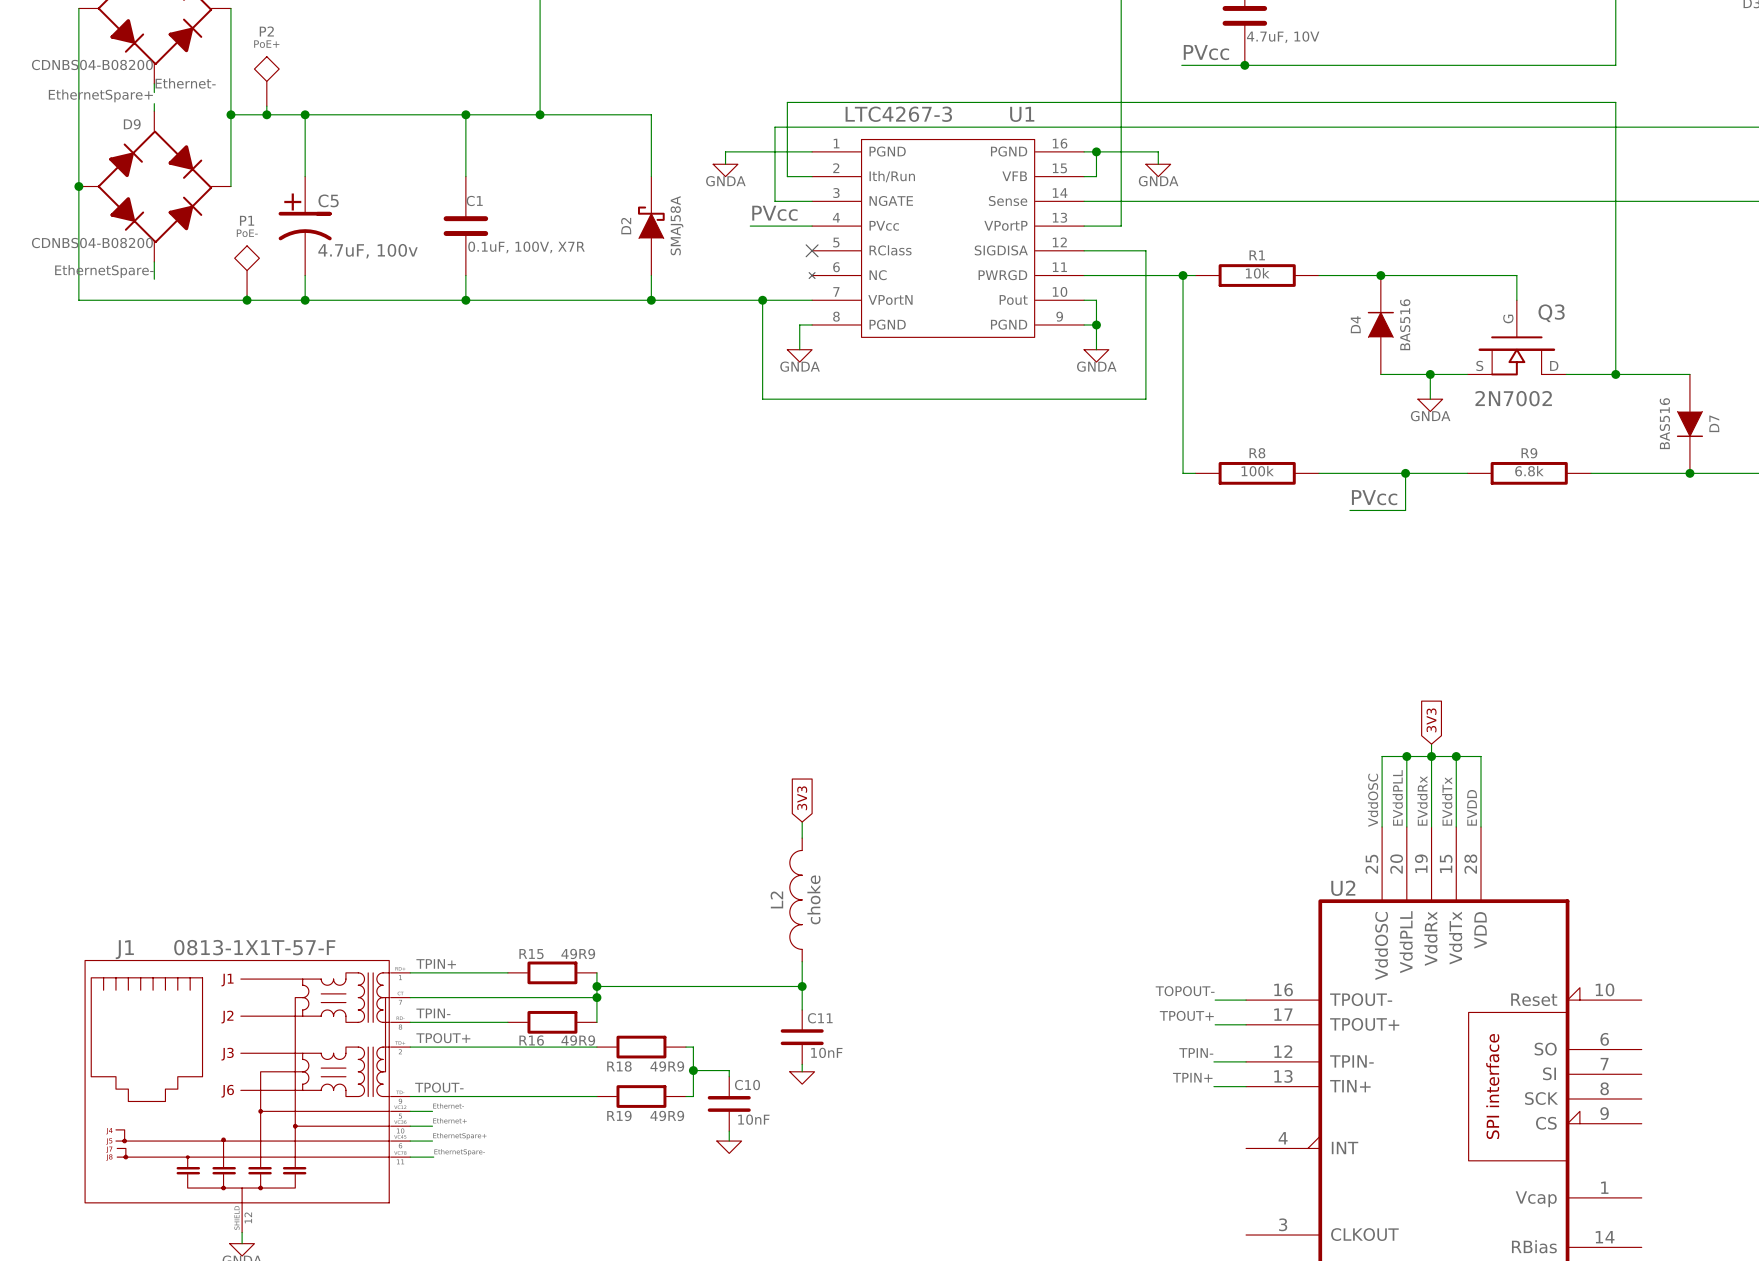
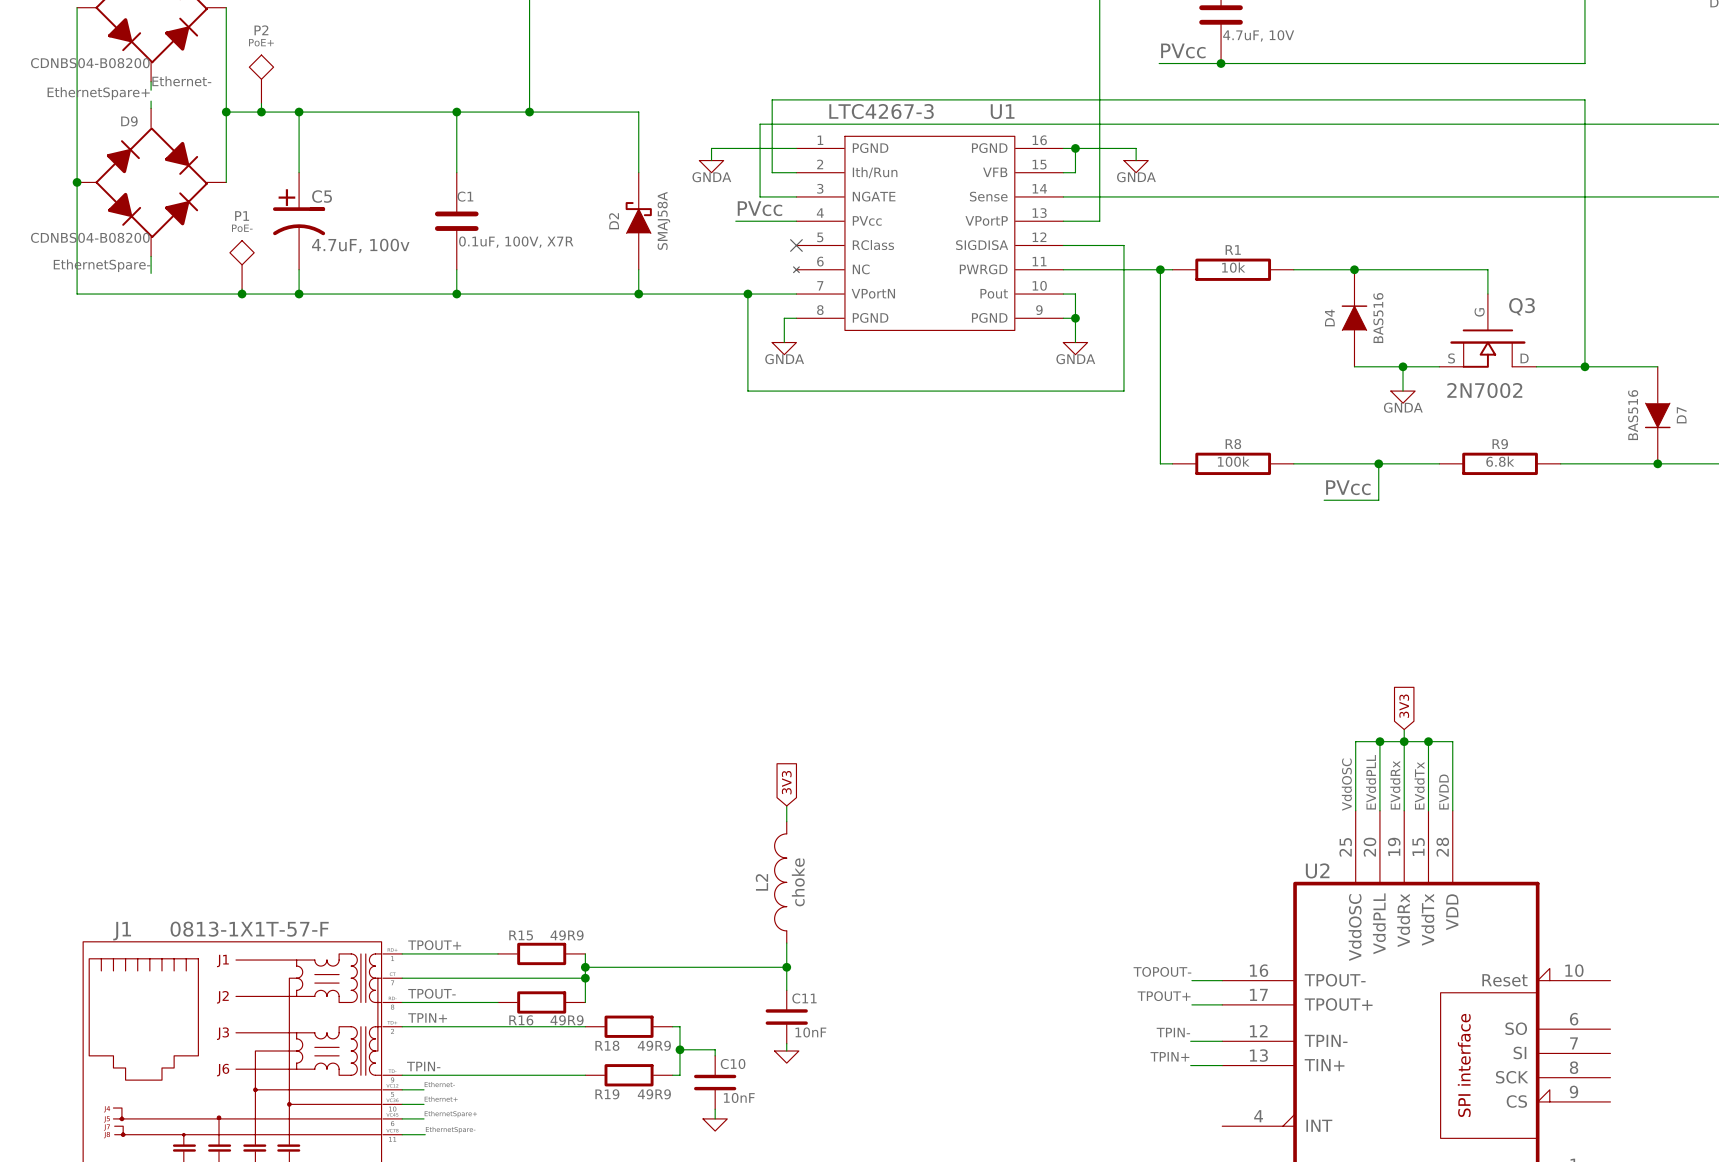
label: TPIN+ (436, 963) -> TPOUT+ (434, 945)
label: TPIN- (433, 1013) -> TPOUT- (431, 993)
label: TPOUT+ (443, 1038) -> TPIN+ (427, 1017)
label: TPOUT- (439, 1087) -> TPIN- (423, 1066)

